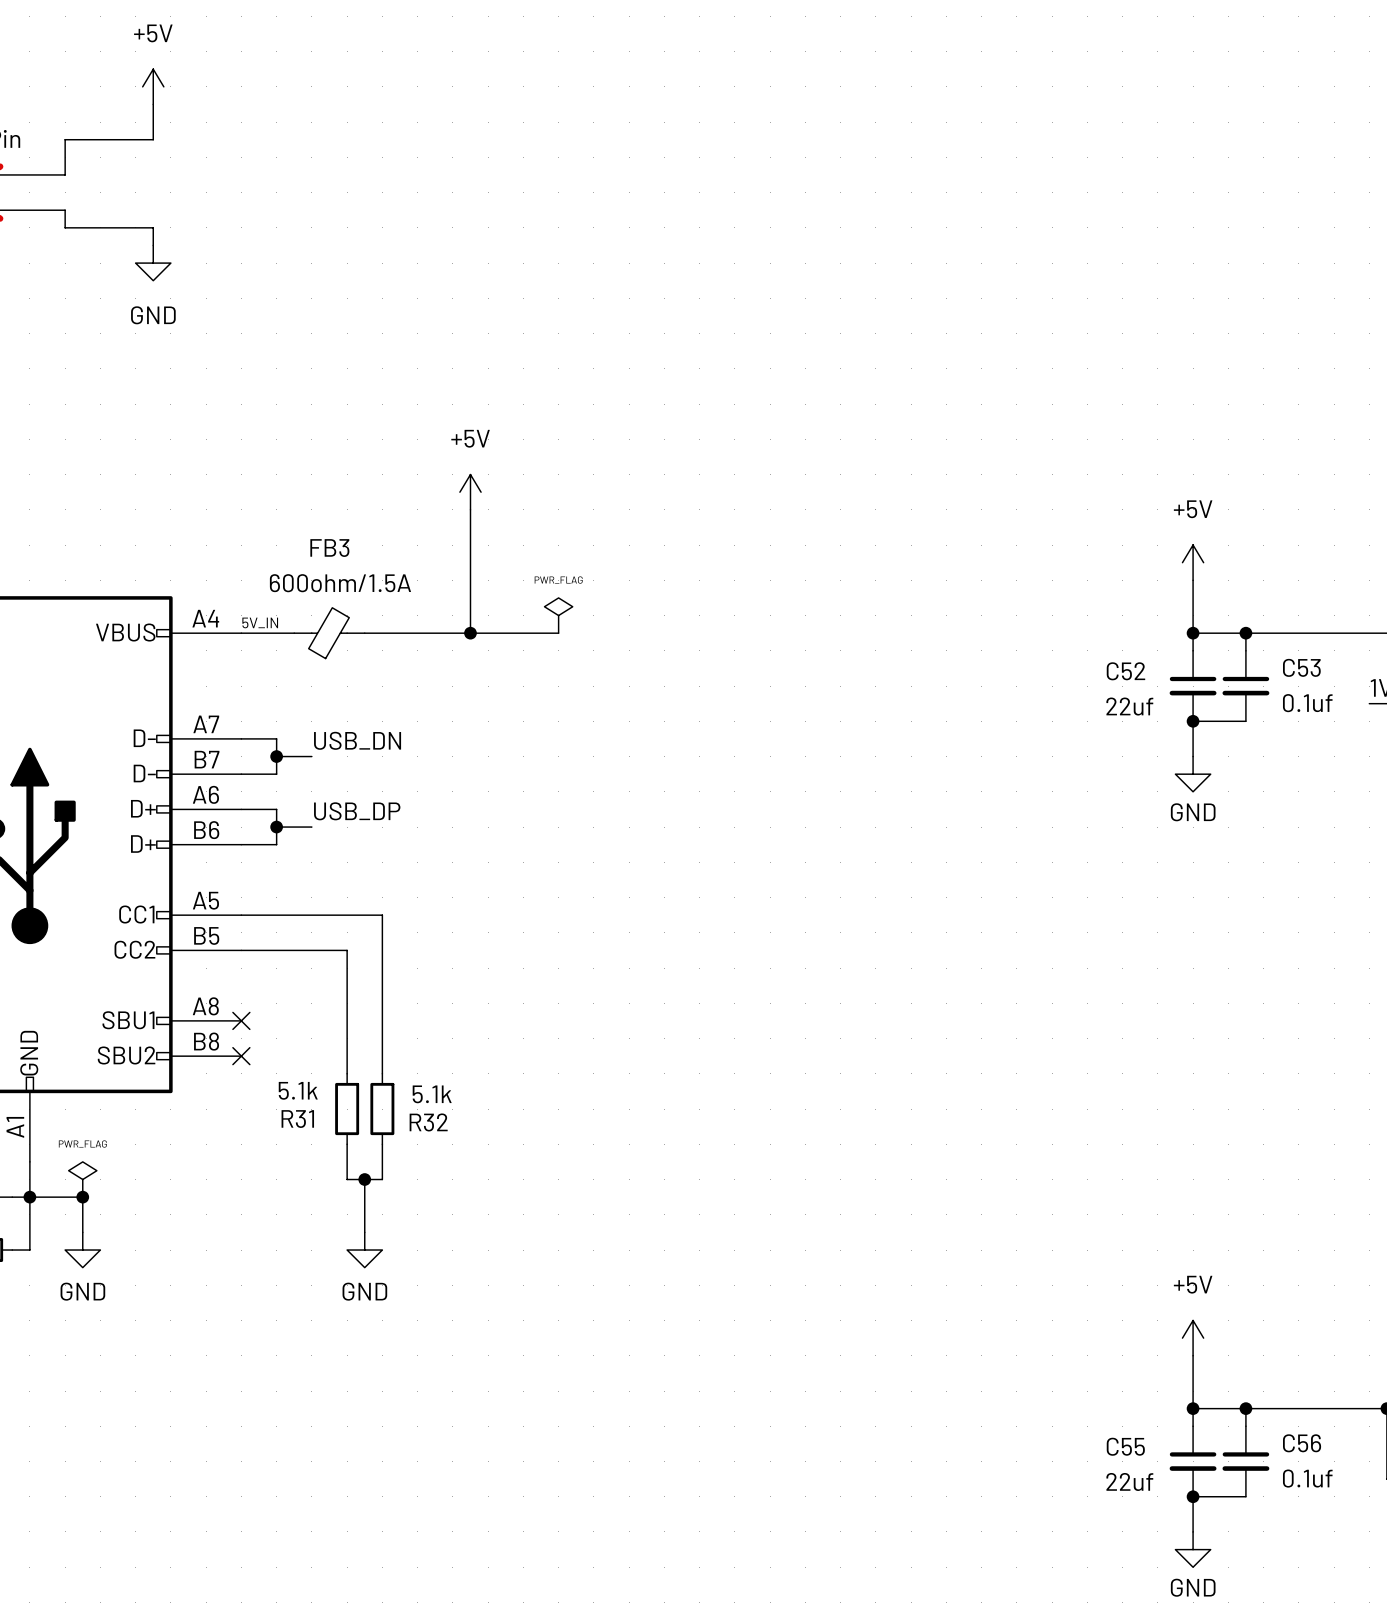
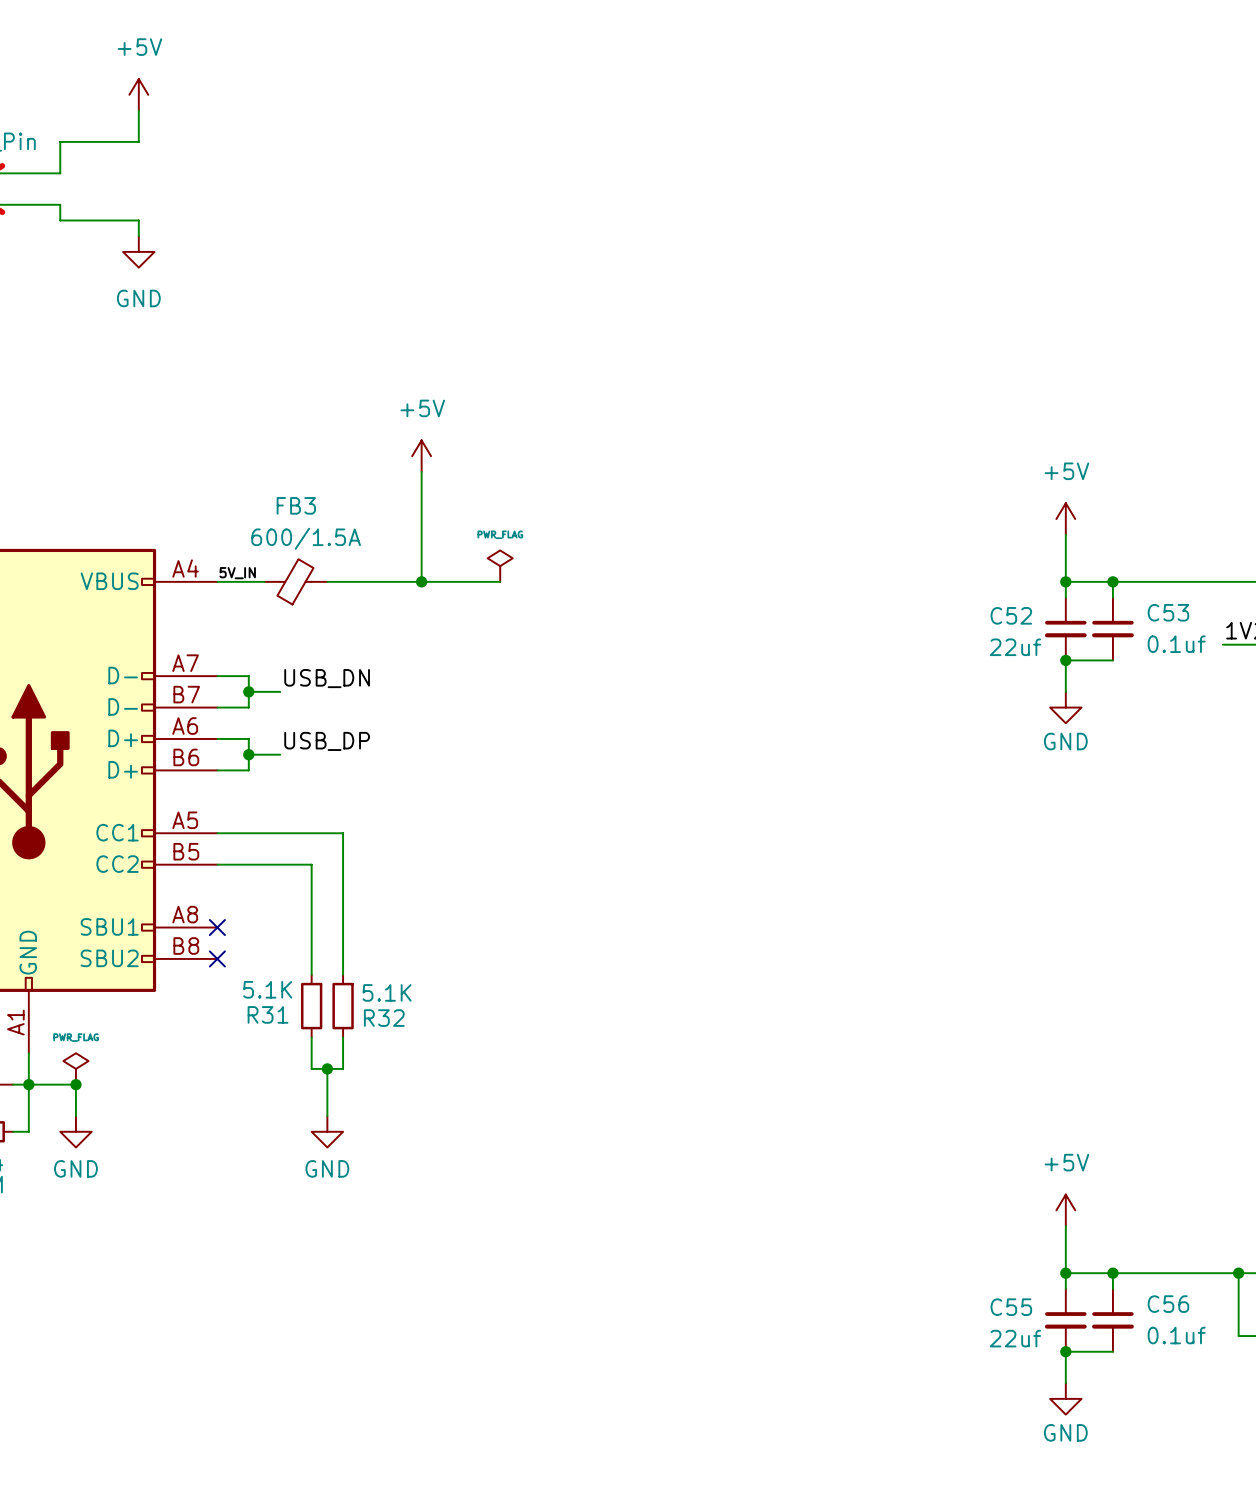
FB3 value: 600ohm/1.5A (340, 583) -> 600/1.5A (306, 538)
R31 value: 5.1k (298, 1090) -> 5.1K (267, 989)
R32 value: 5.1k (432, 1094) -> 5.1K (387, 992)

